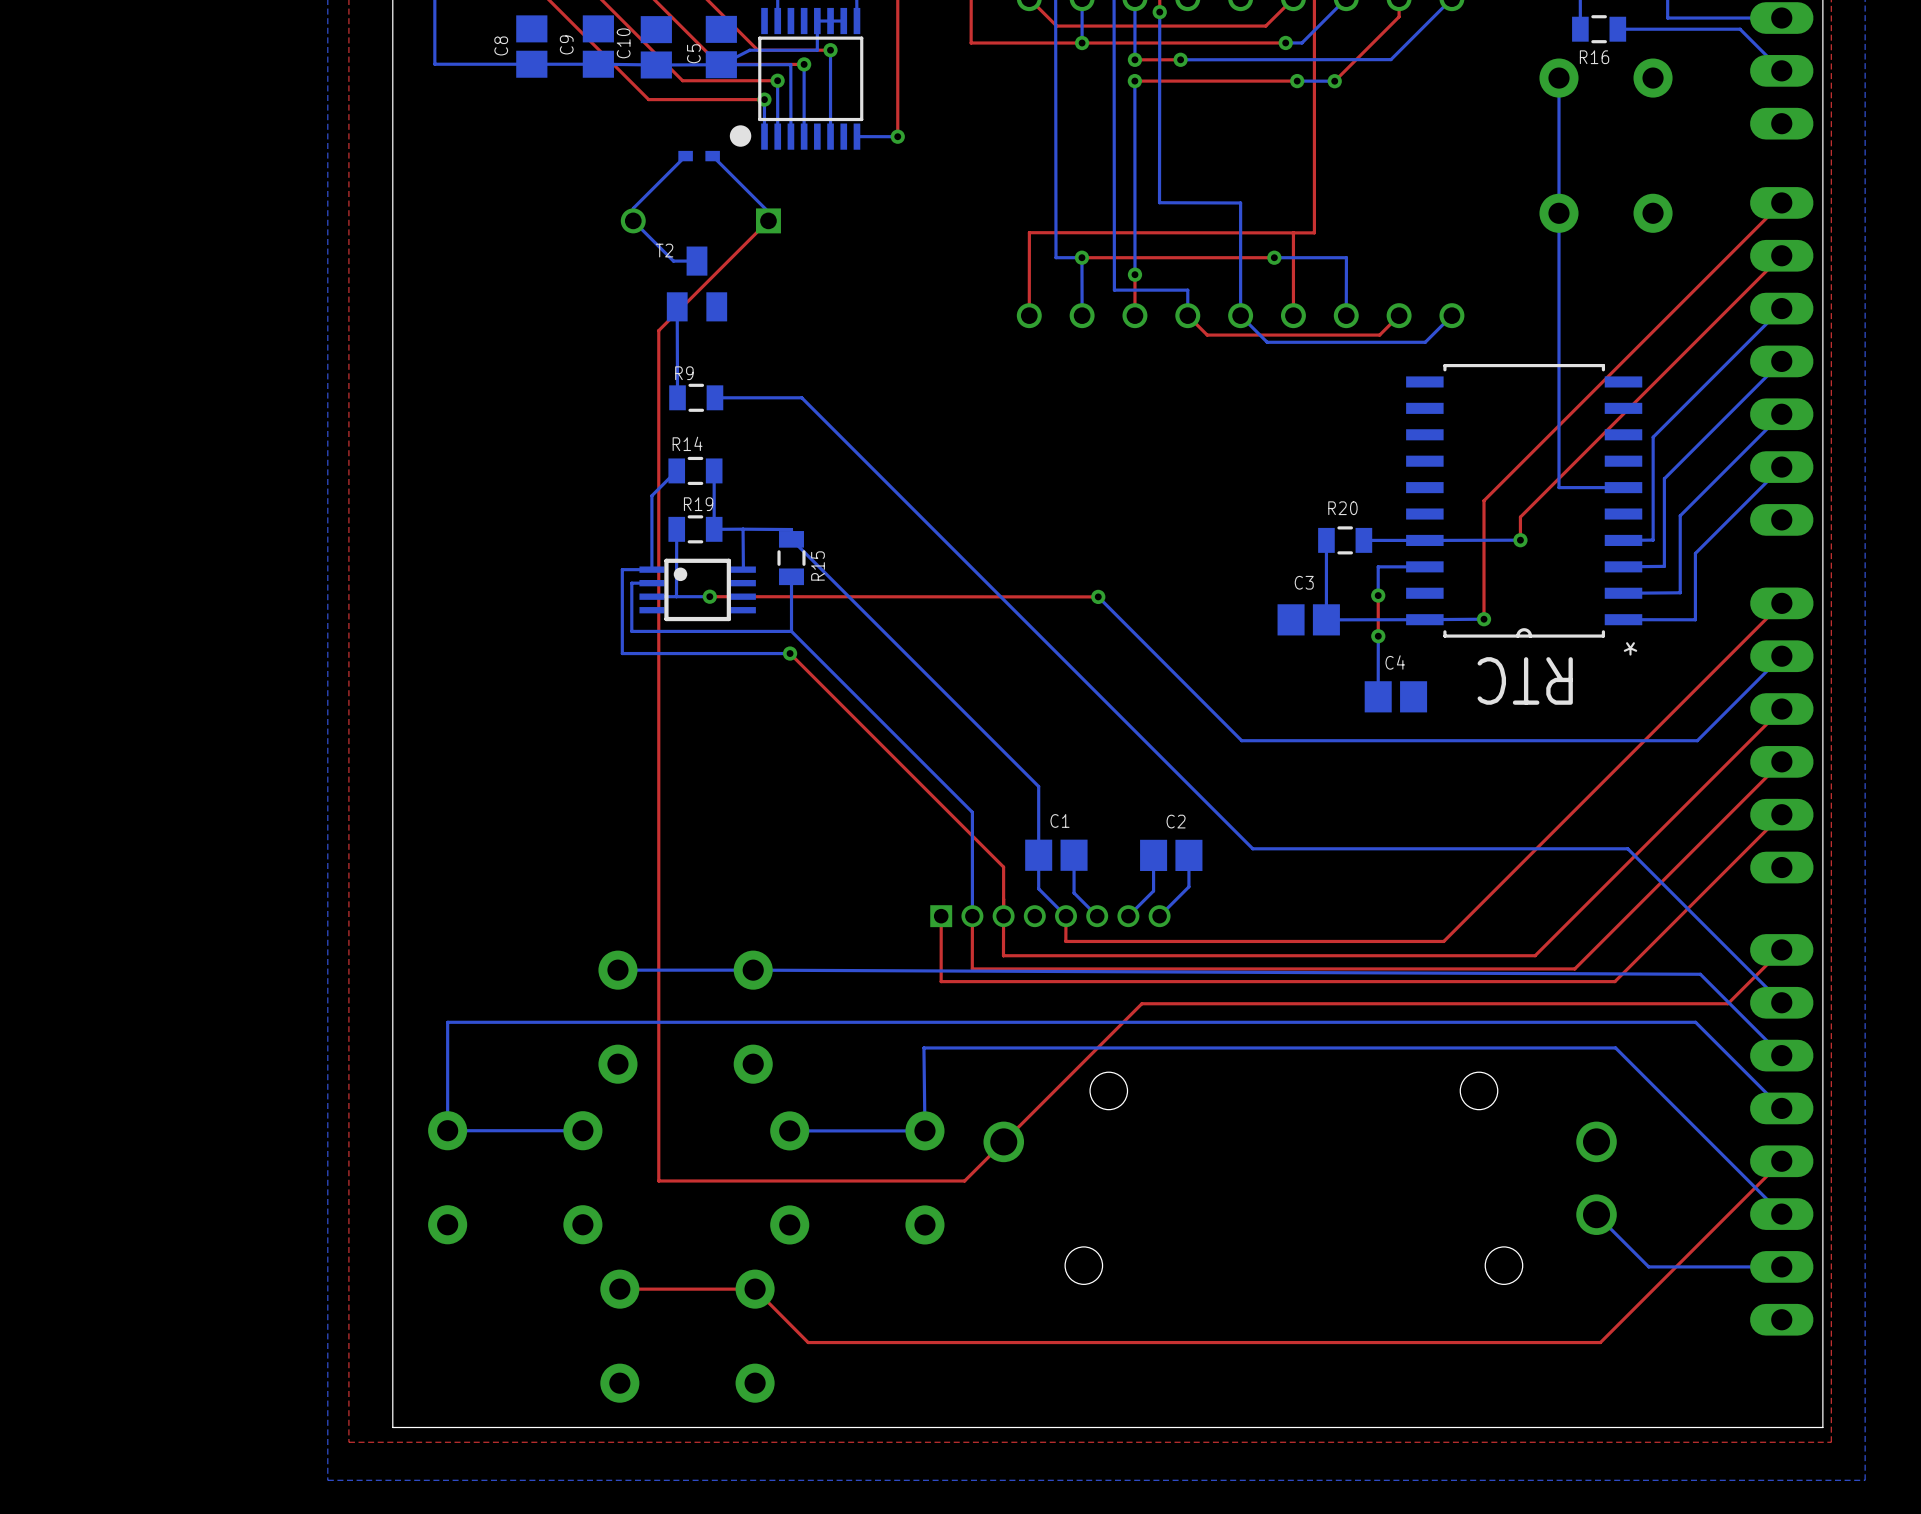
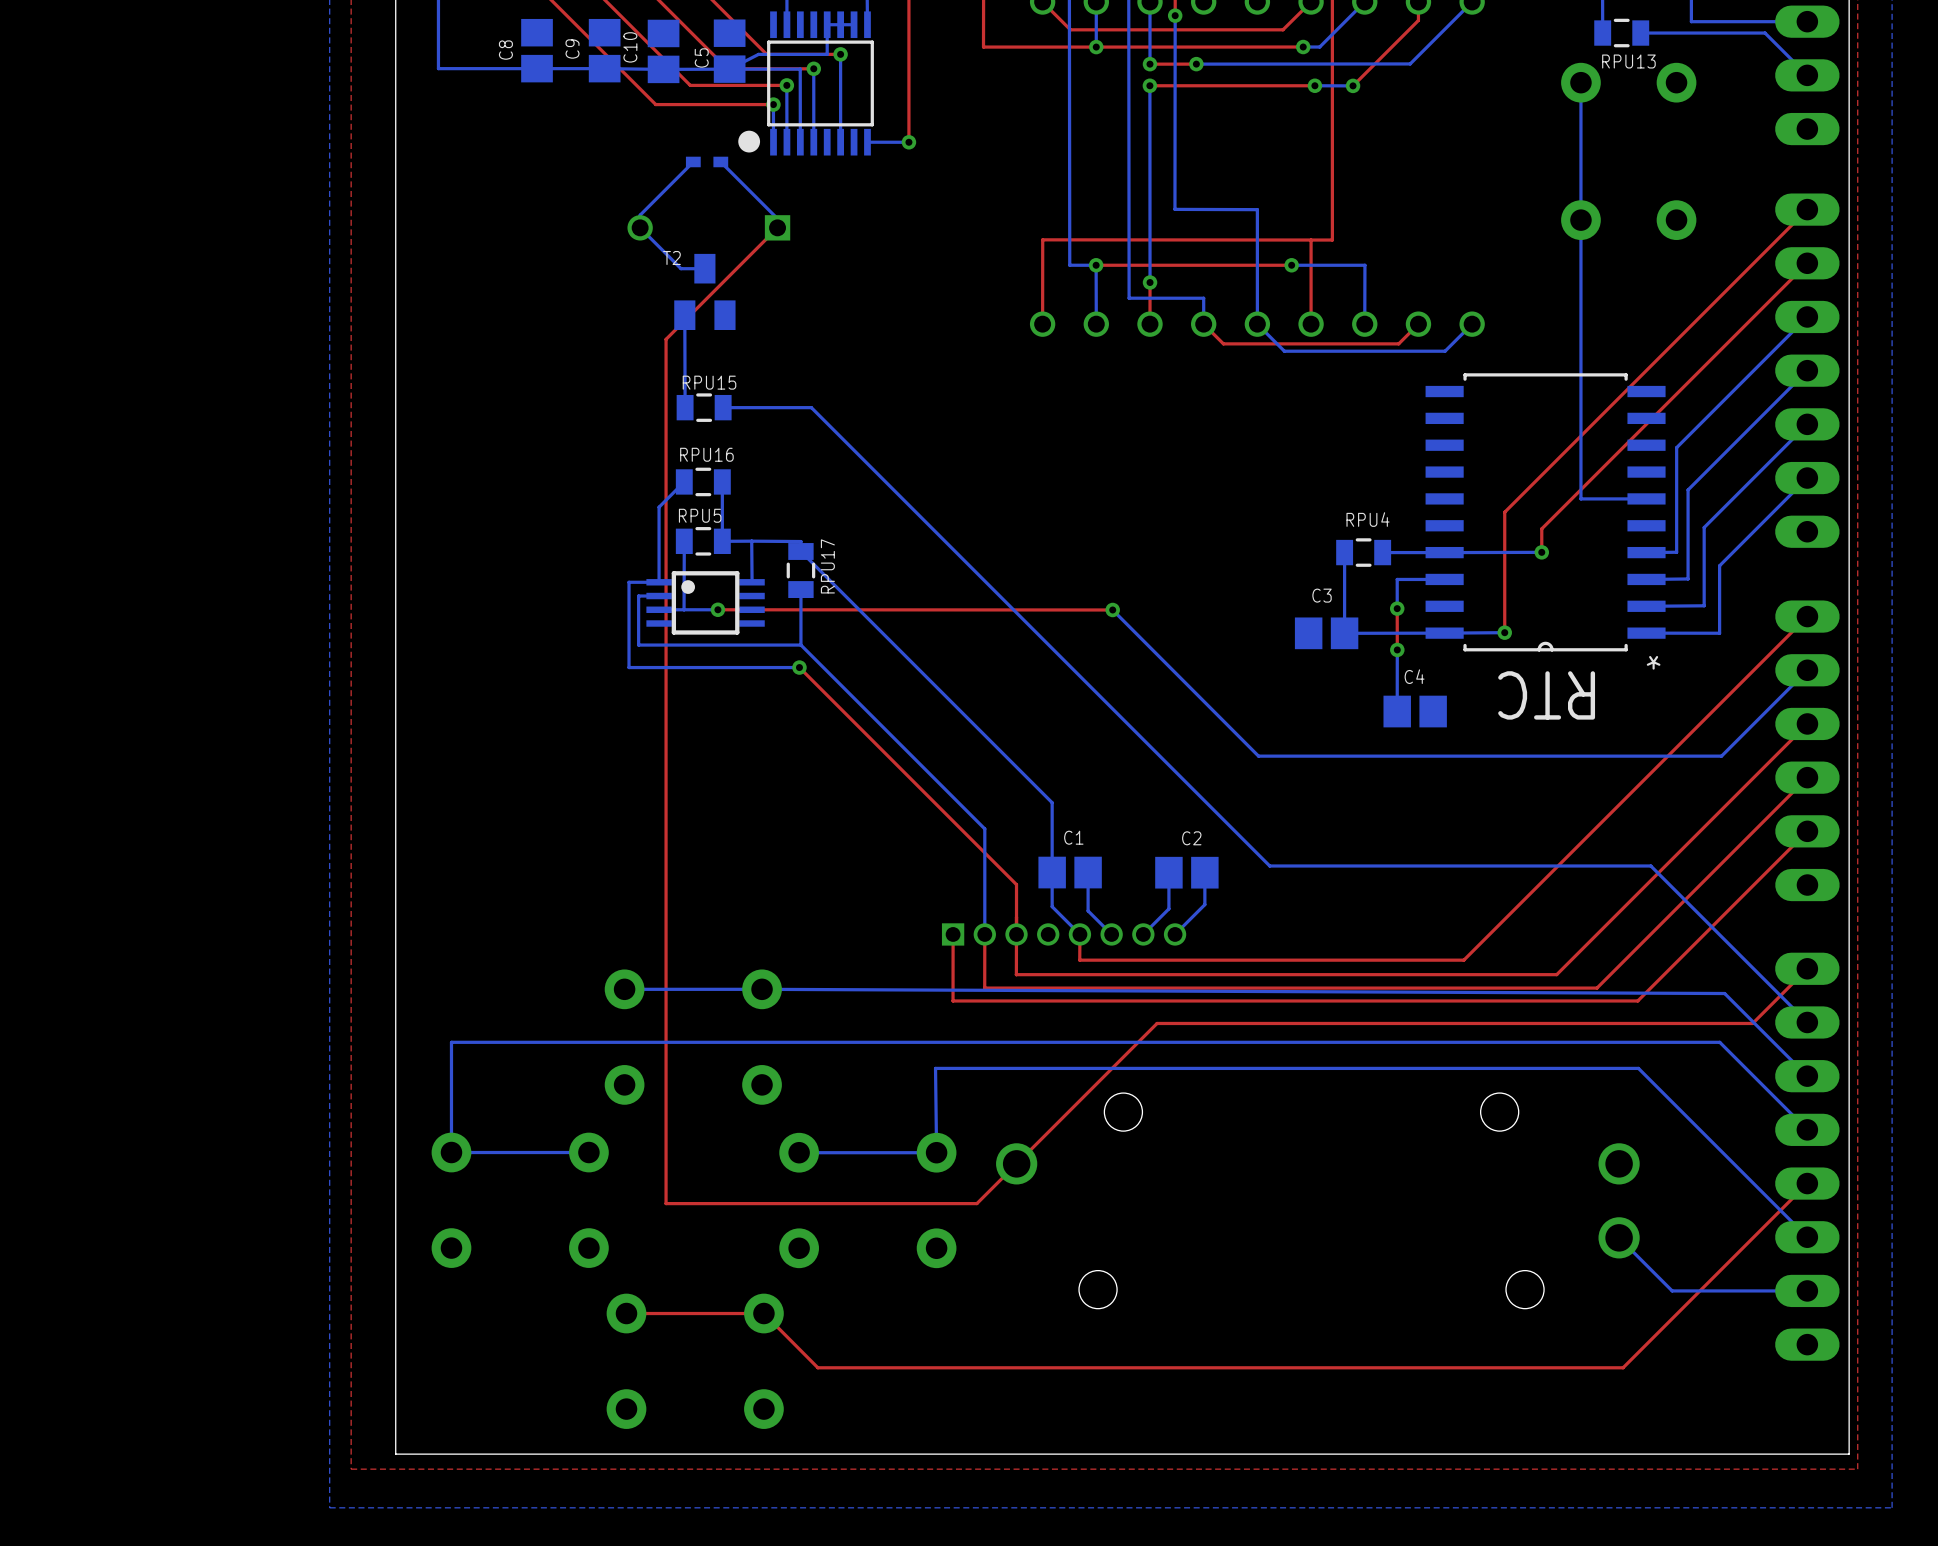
R16 name: R16 (1594, 57) -> RPU13 (1628, 61)
R9 name: R9 (684, 373) -> RPU15 (709, 382)
R14 name: R14 (687, 443) -> RPU16 (706, 454)
R19 name: R19 (698, 504) -> RPU5 (700, 515)
R20 name: R20 (1342, 508) -> RPU4 (1368, 519)
R15 name: R15 (817, 565) -> RPU17 (827, 566)

